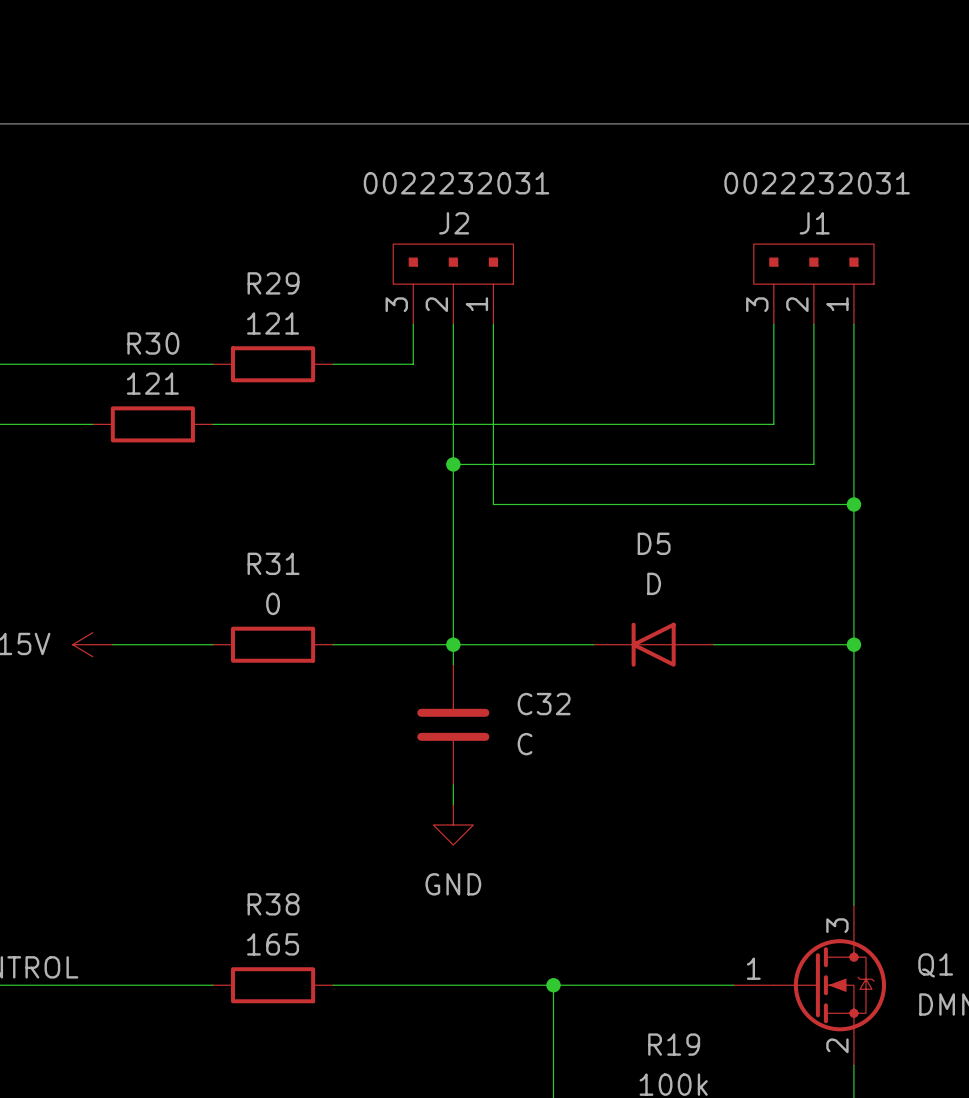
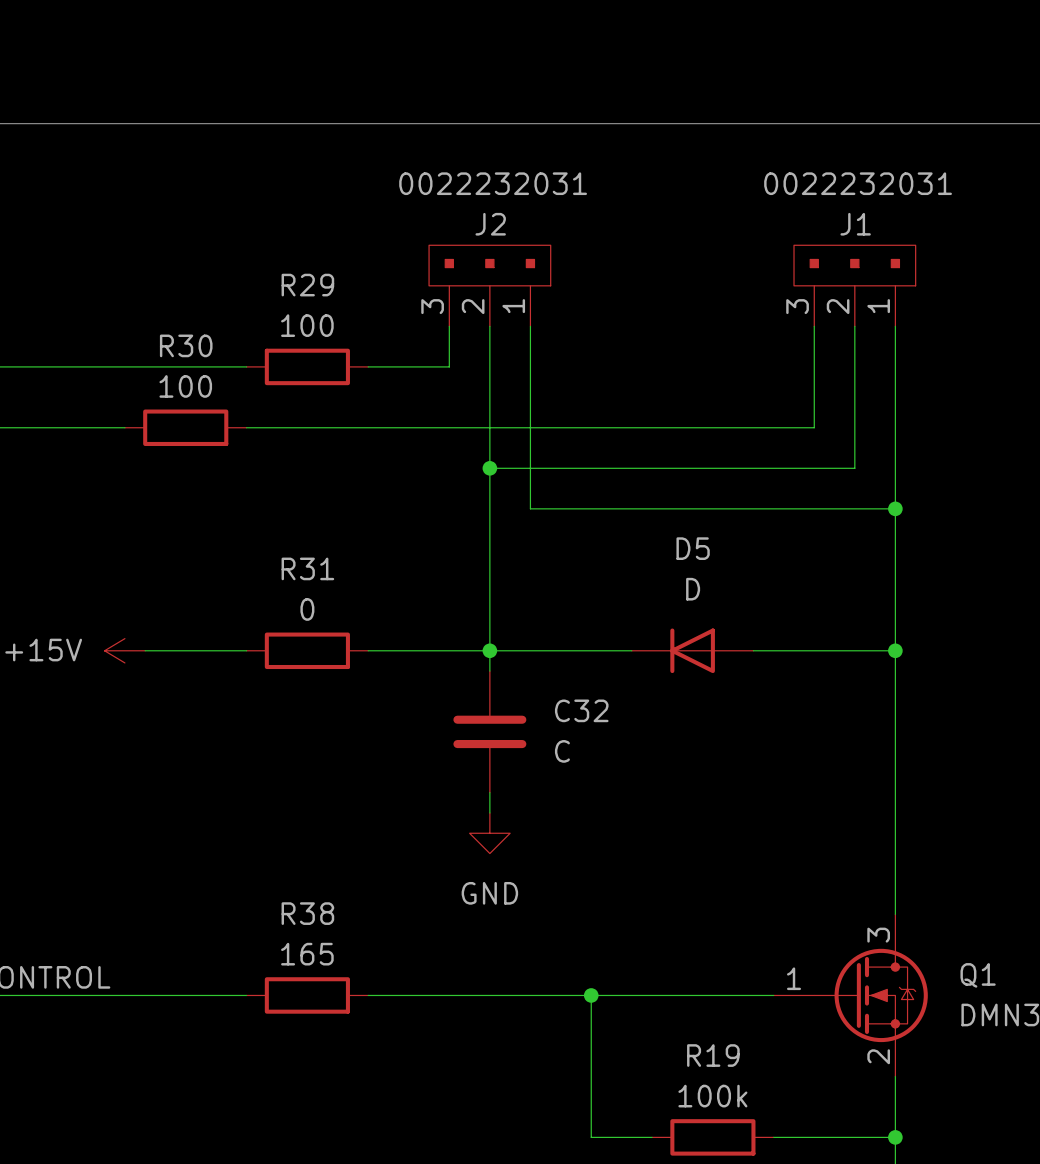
R29 value: 121 (273, 323) -> 100 (307, 325)
R30 value: 121 (152, 383) -> 100 (185, 386)

